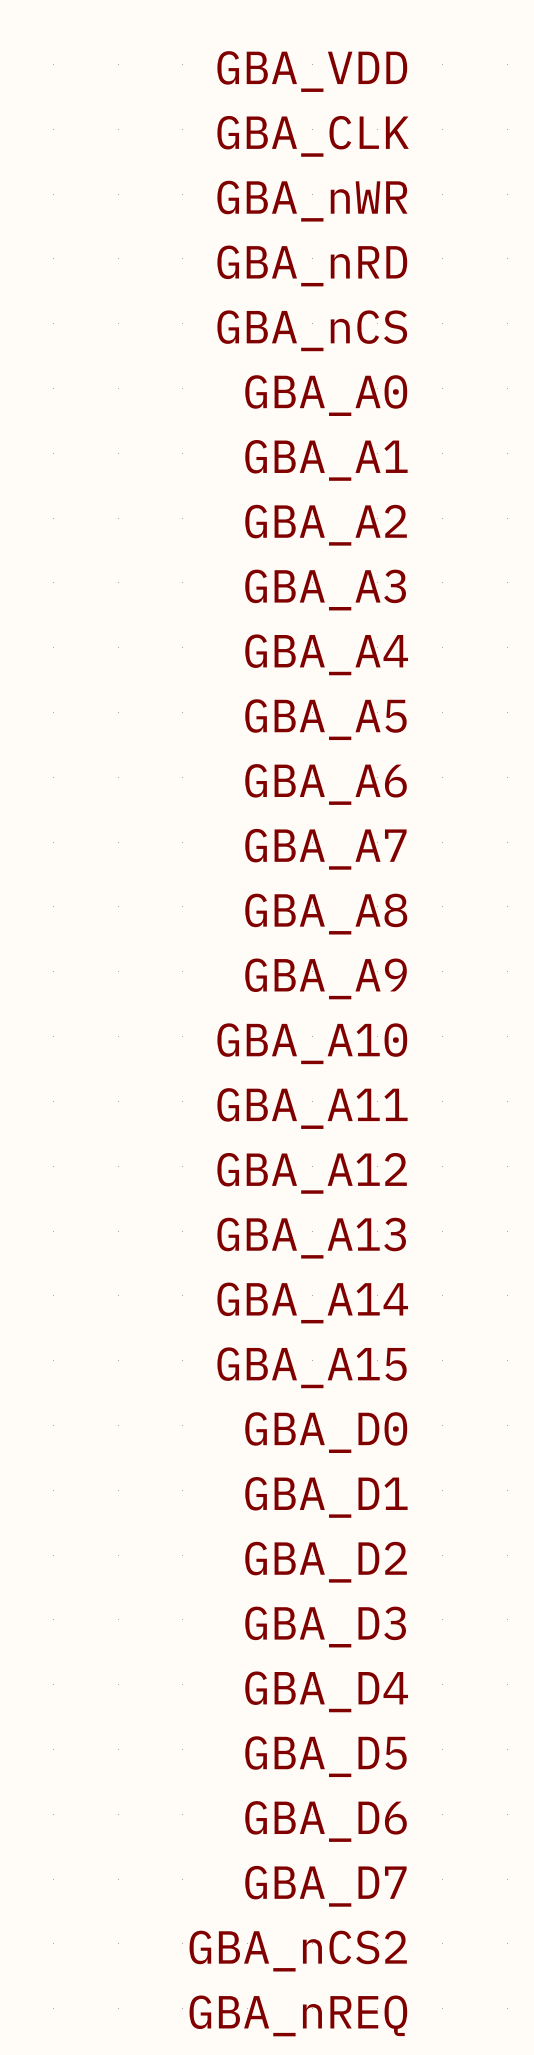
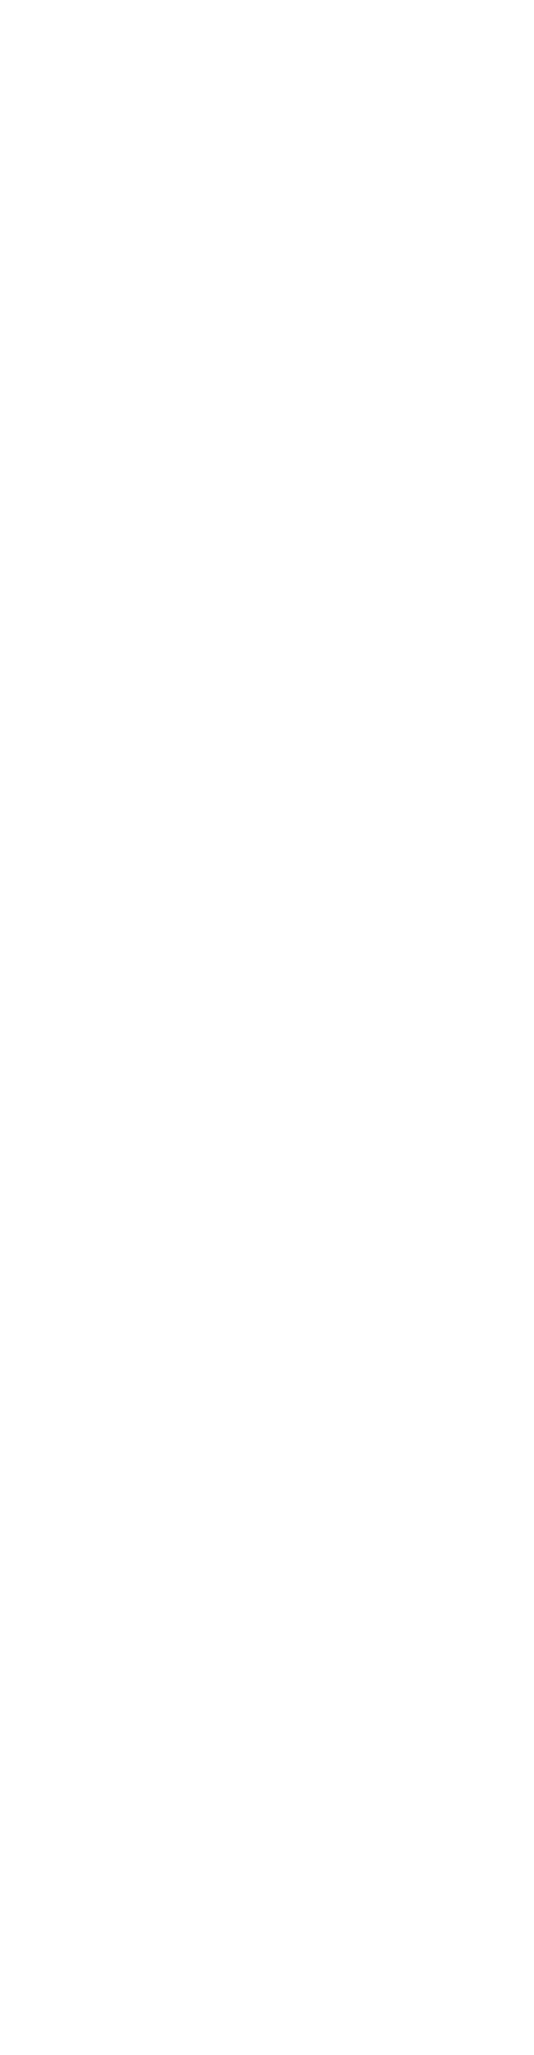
label: GBA_VDD (312, 71) -> none
label: GBA_CLK (313, 136) -> none
label: GBA_nWR (312, 201) -> none
label: GBA_nRD (312, 265) -> none
label: GBA_nCS (312, 330) -> none
label: GBA_A0 (326, 395) -> none
label: GBA_A1 (326, 460) -> none
label: GBA_A2 (326, 525) -> none
label: GBA_A3 (325, 590) -> none
label: GBA_A4 (326, 654) -> none
label: GBA_A5 (325, 719) -> none
label: GBA_A6 (326, 784) -> none
label: GBA_A7 (325, 849) -> none
label: GBA_A8 (326, 914) -> none
label: GBA_A9 (326, 978) -> none
label: GBA_A10 (312, 1043) -> none
label: GBA_A11 (312, 1108) -> none
label: GBA_A12 (312, 1173) -> none
label: GBA_A13 (311, 1238) -> none
label: GBA_A14 (312, 1302) -> none
label: GBA_A15 (312, 1367) -> none
label: GBA_D0 (326, 1432) -> none
label: GBA_D1 (326, 1497) -> none
label: GBA_D2 (326, 1562) -> none
label: GBA_D3 (325, 1627) -> none
label: GBA_D4 (326, 1691) -> none
label: GBA_D5 (325, 1756) -> none
label: GBA_D6 (326, 1821) -> none
label: GBA_D7 (325, 1886) -> none
label: GBA_nCS2 (298, 1951) -> none
label: GBA_nREQ (298, 2015) -> none

